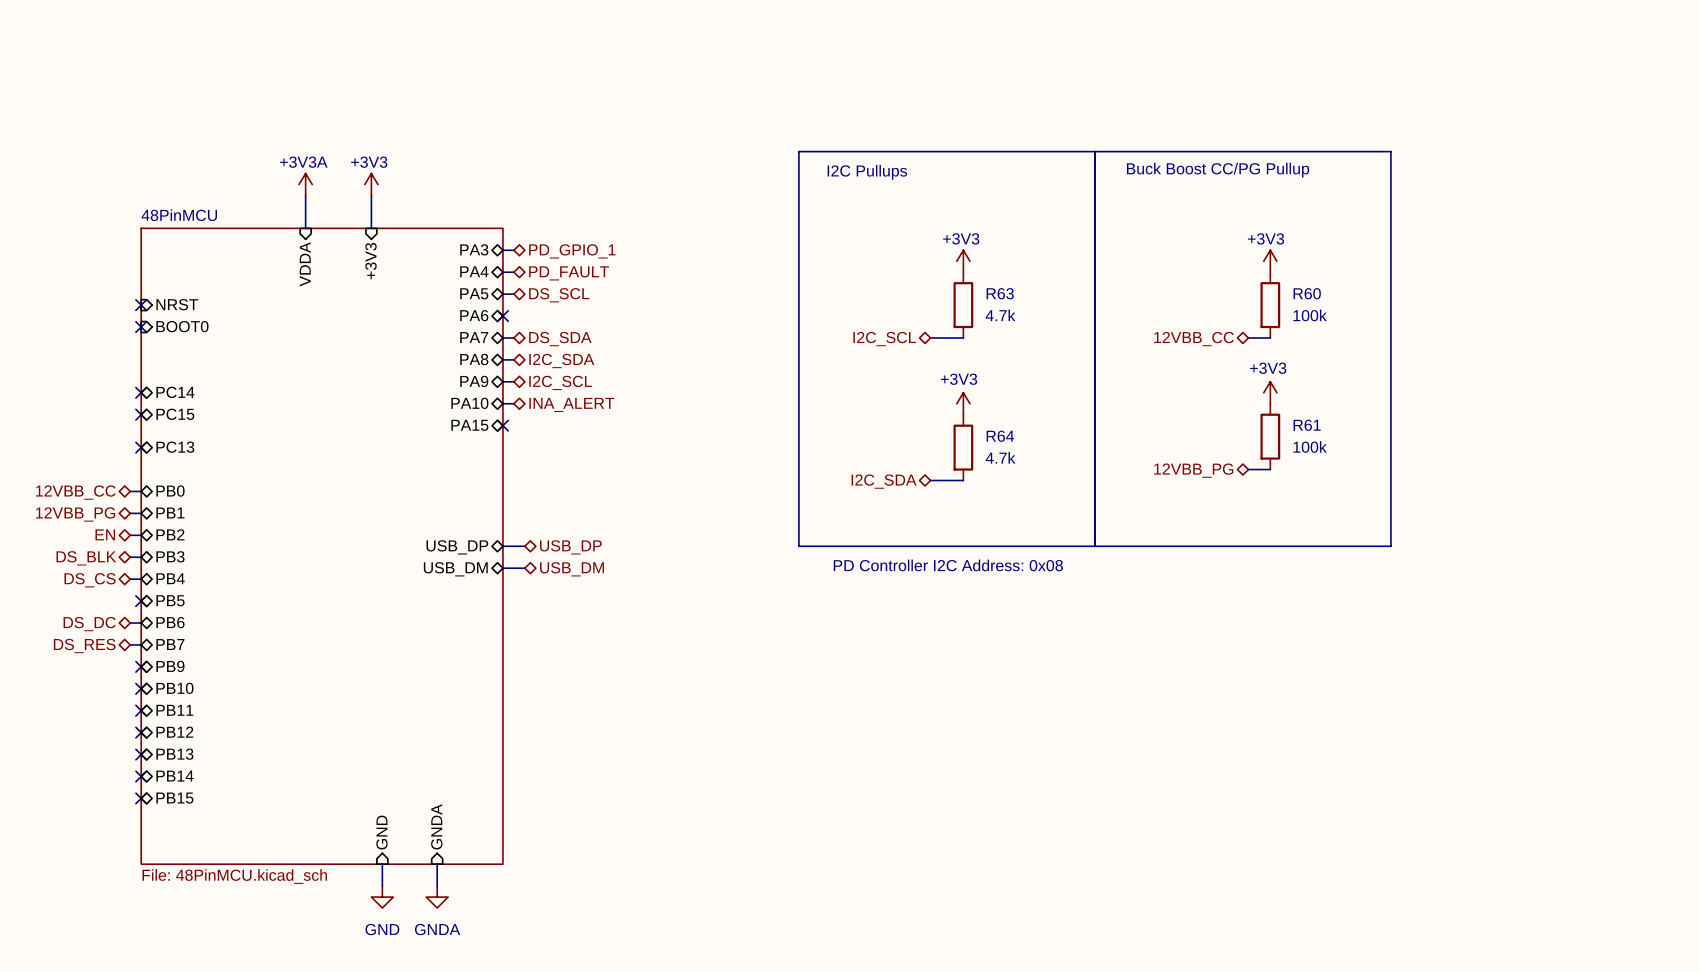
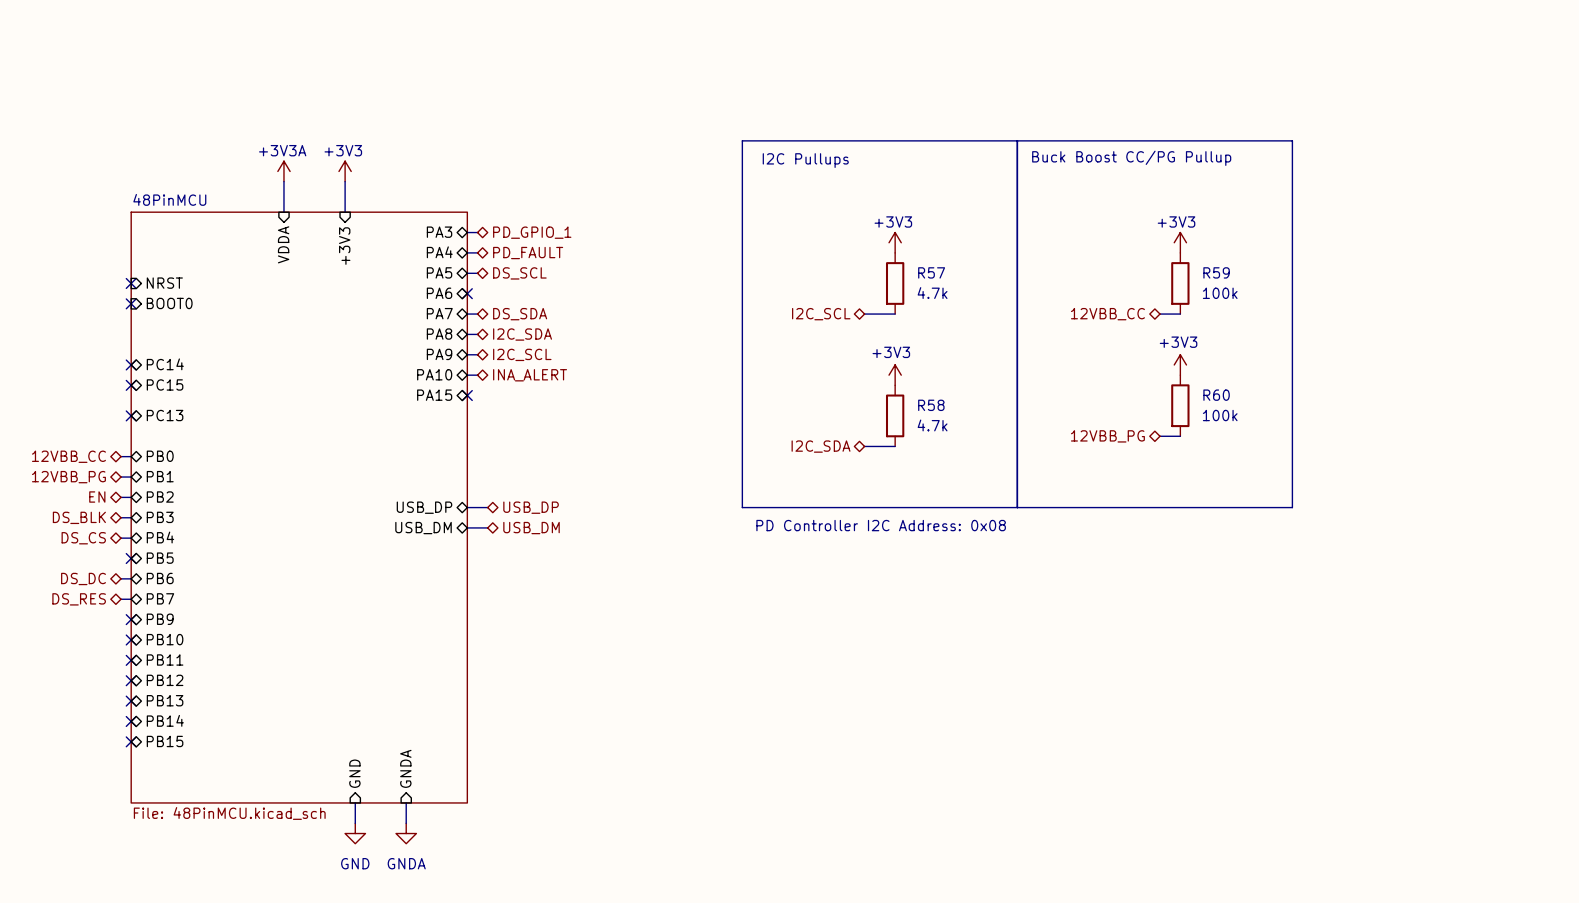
R63 name: R63 (1000, 293) -> R57 (931, 272)
R60 name: R60 (1307, 293) -> R59 (1216, 272)
R61 name: R61 (1307, 425) -> R60 (1216, 395)
R64 name: R64 (1000, 436) -> R58 (931, 405)

